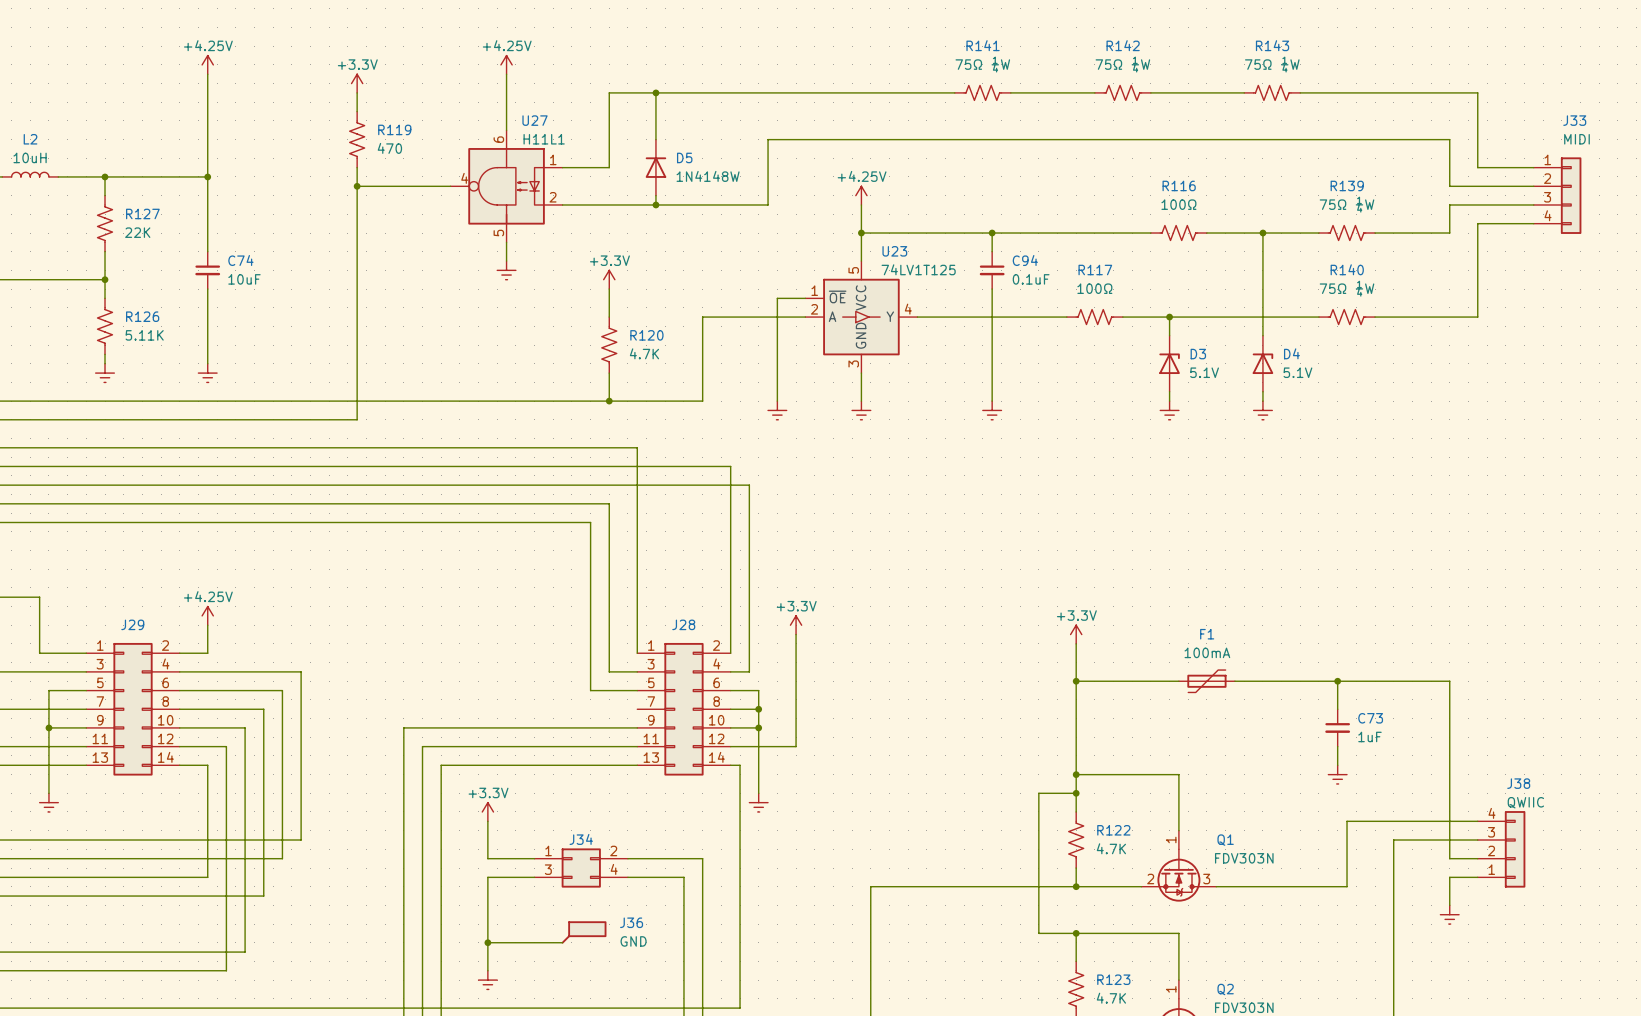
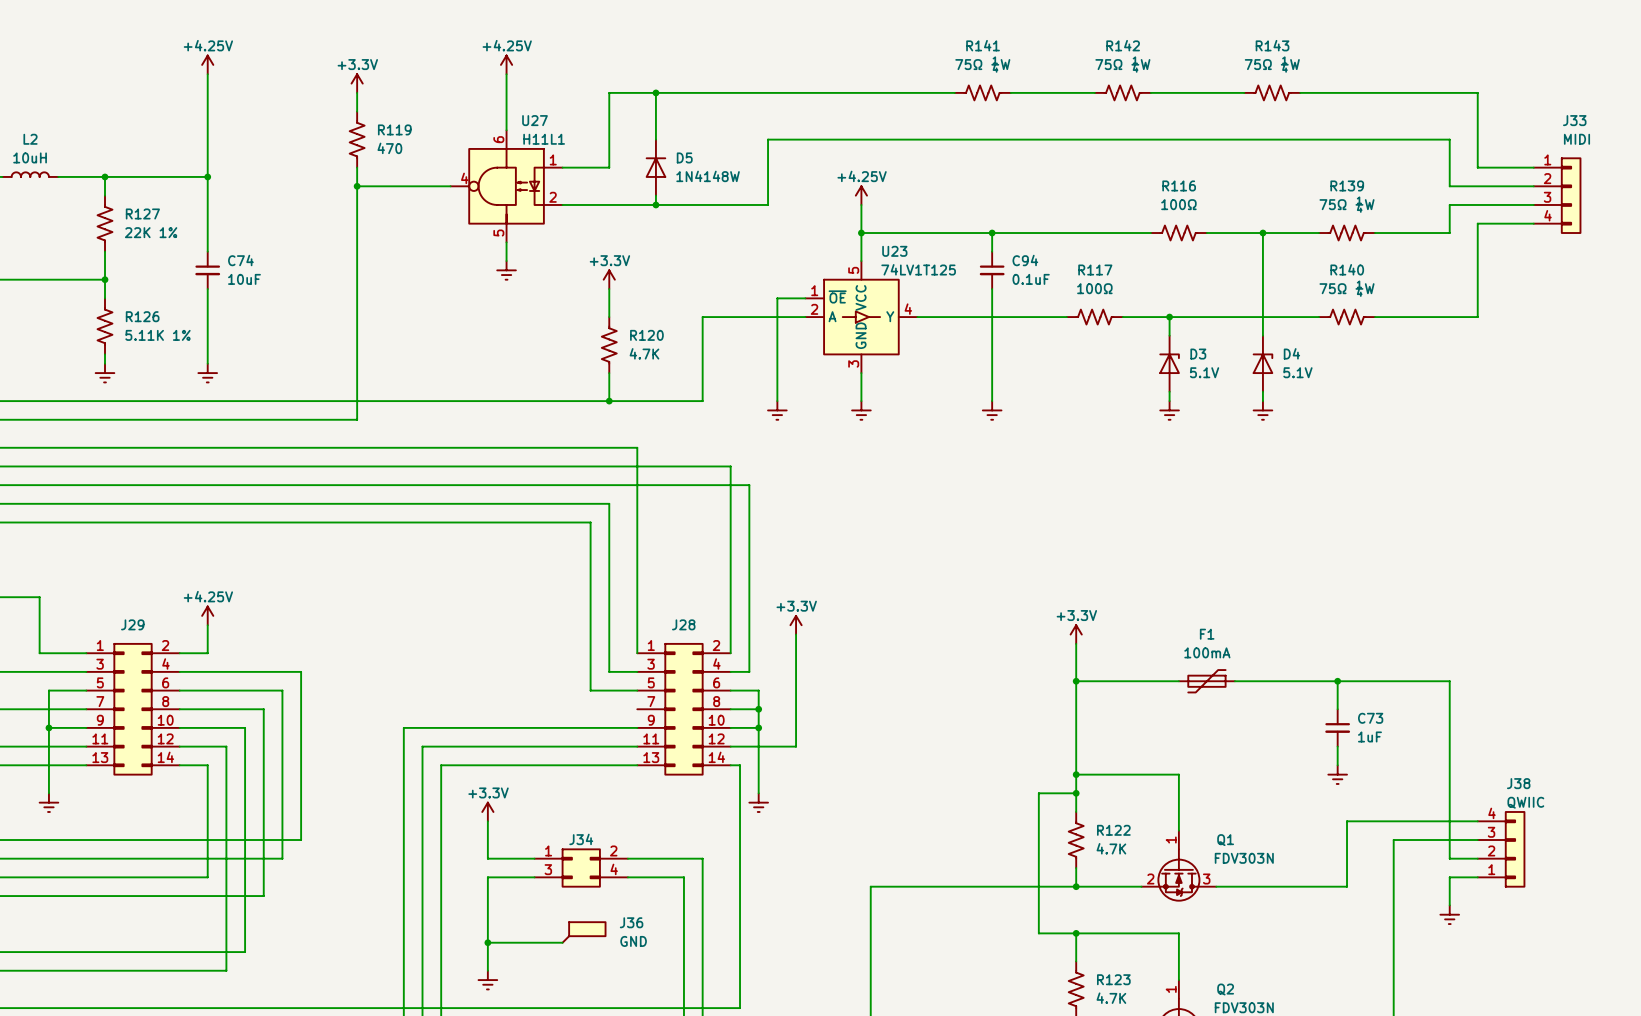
R127 value: 22K (137, 232) -> 22K 1% (151, 232)
R126 value: 5.11K (144, 335) -> 5.11K 1% (157, 335)

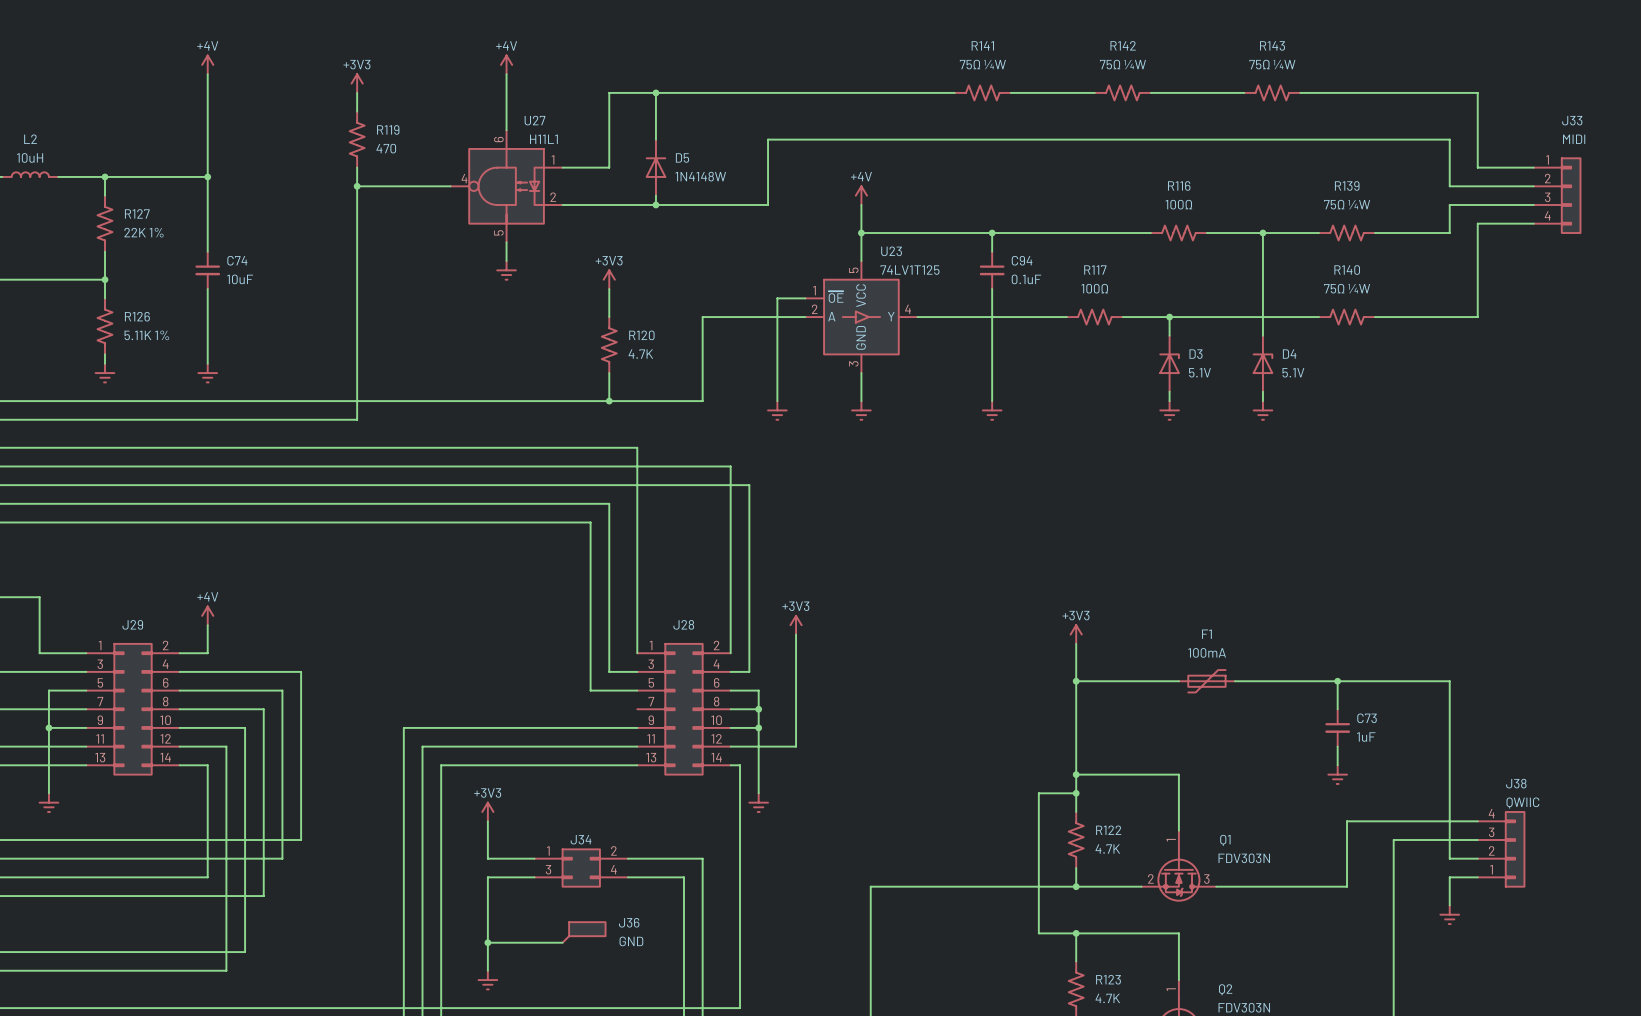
power symbol: +4.25V (207, 64) -> +4V (207, 64)
power symbol: +4.25V (506, 64) -> +4V (506, 64)
power symbol: +3.3V (357, 83) -> +3V3 (357, 83)
power symbol: +4.25V (861, 195) -> +4V (861, 195)
power symbol: +3.3V (609, 279) -> +3V3 (609, 279)
power symbol: +4.25V (207, 615) -> +4V (207, 615)
power symbol: +3.3V (796, 625) -> +3V3 (796, 625)
power symbol: +3.3V (1076, 634) -> +3V3 (1076, 634)
power symbol: +3.3V (487, 811) -> +3V3 (487, 811)

